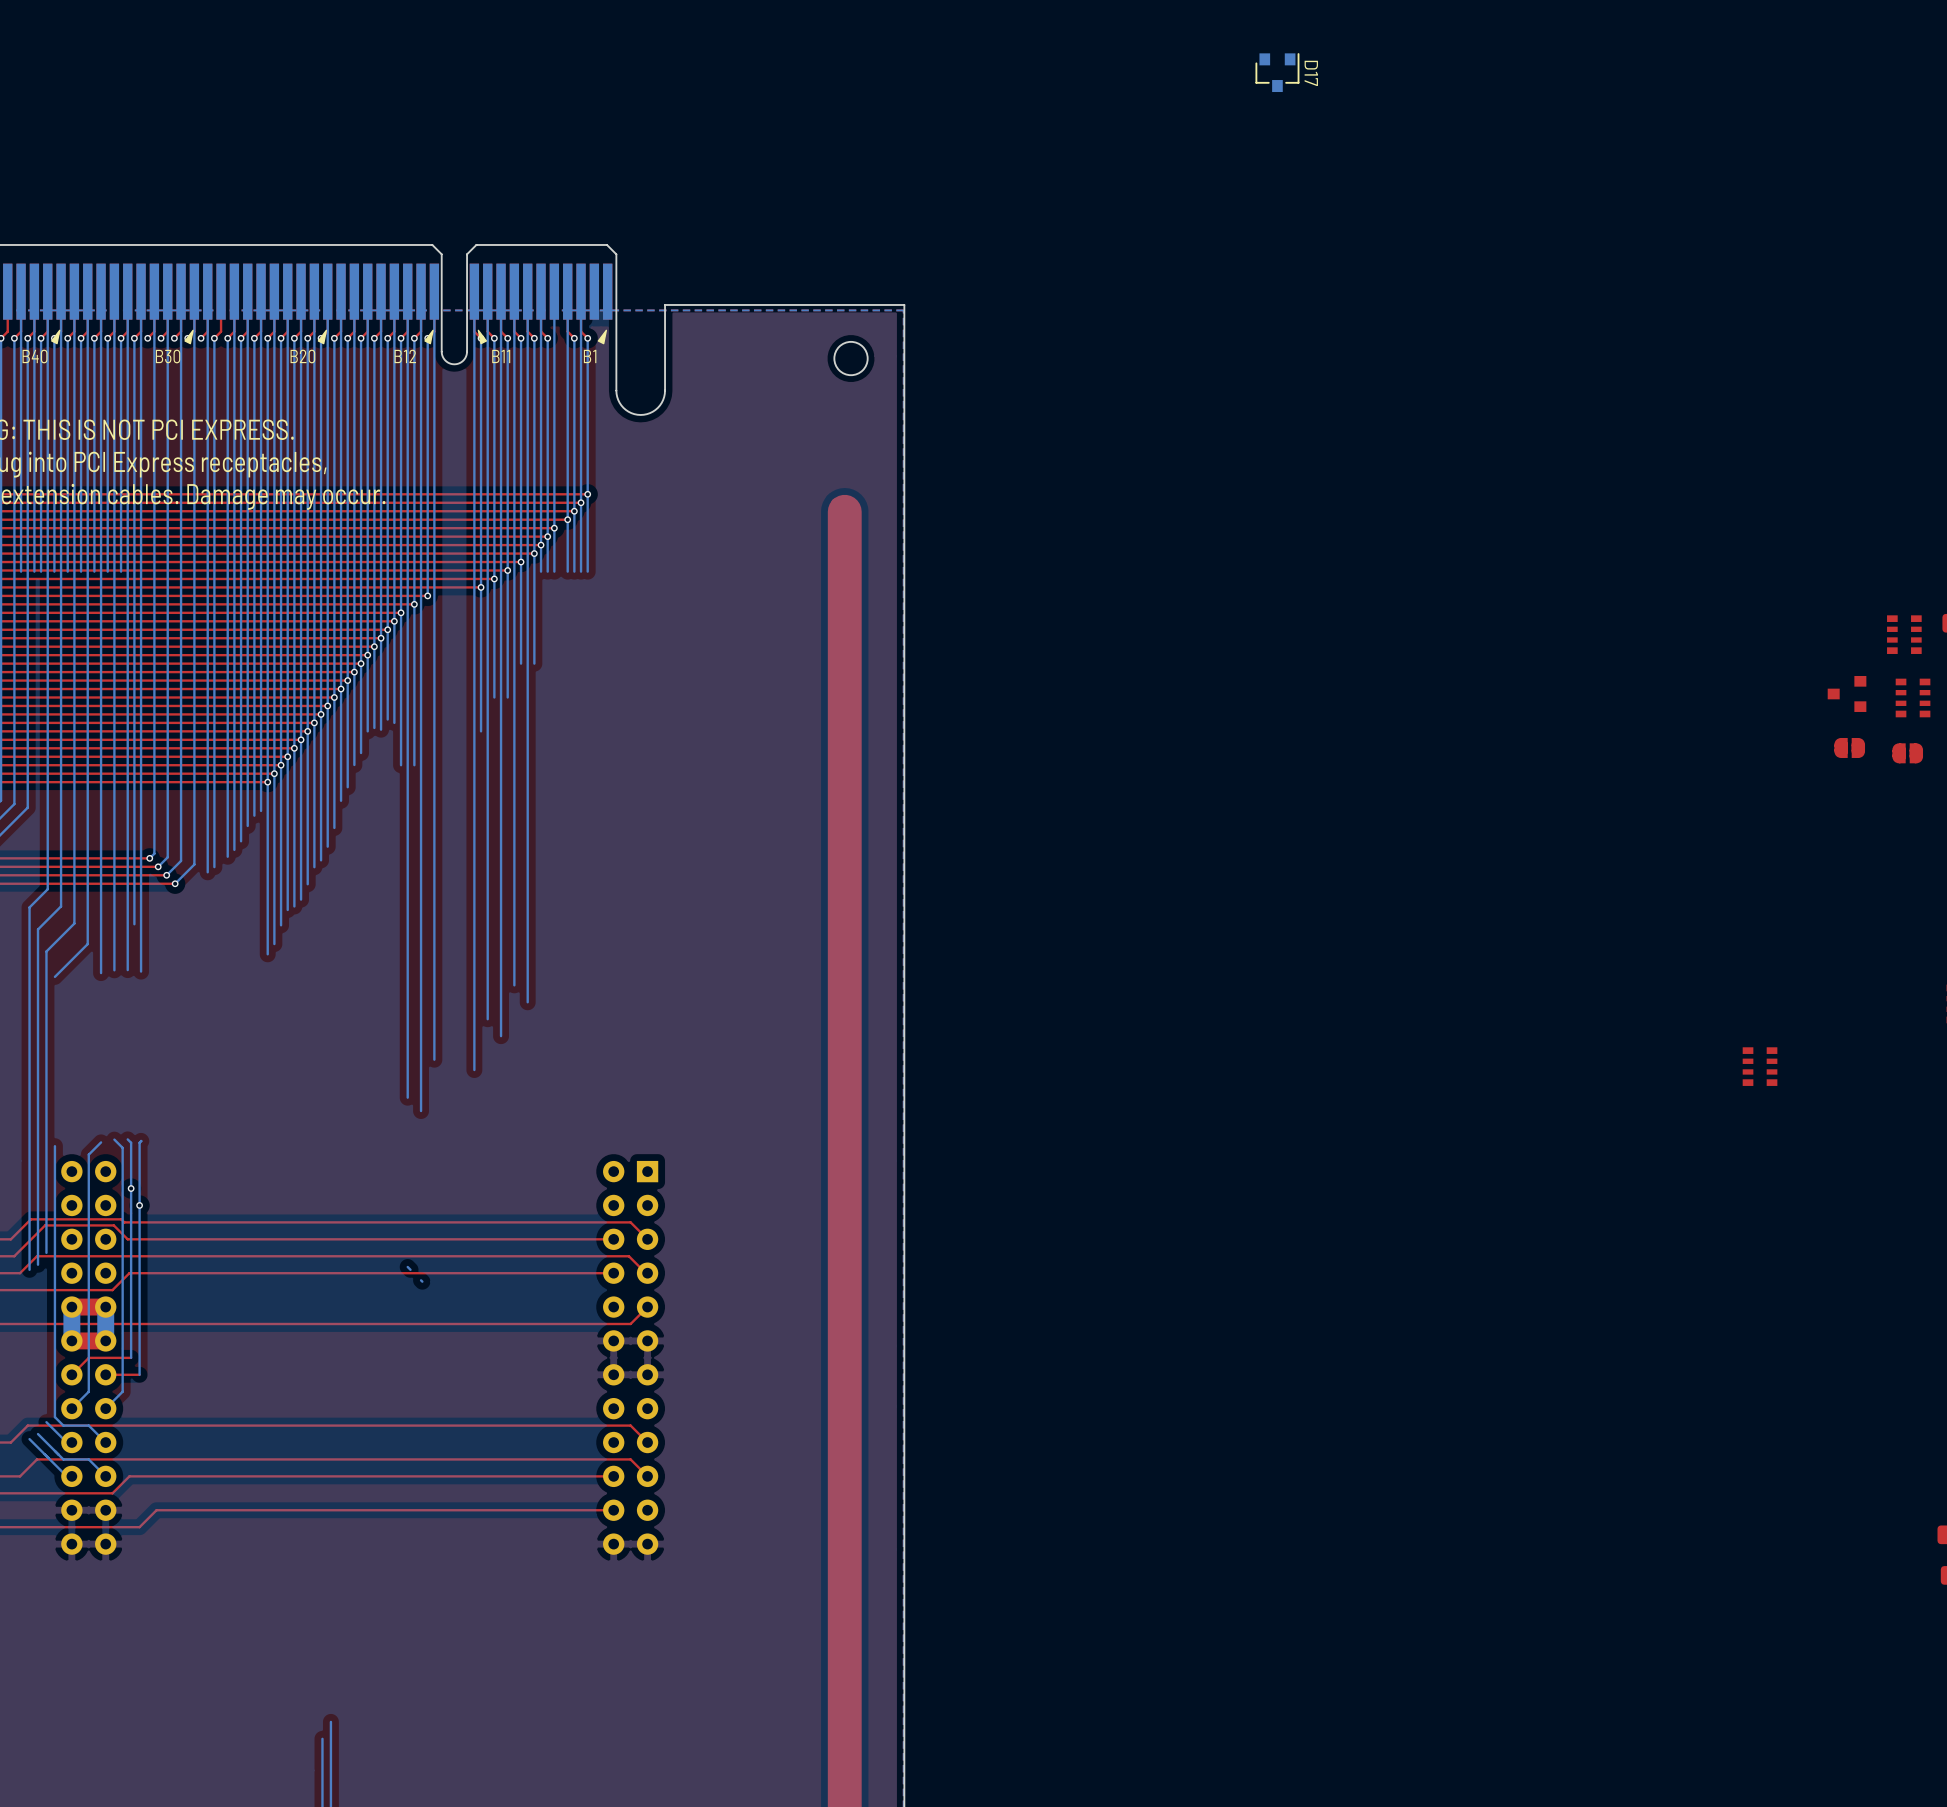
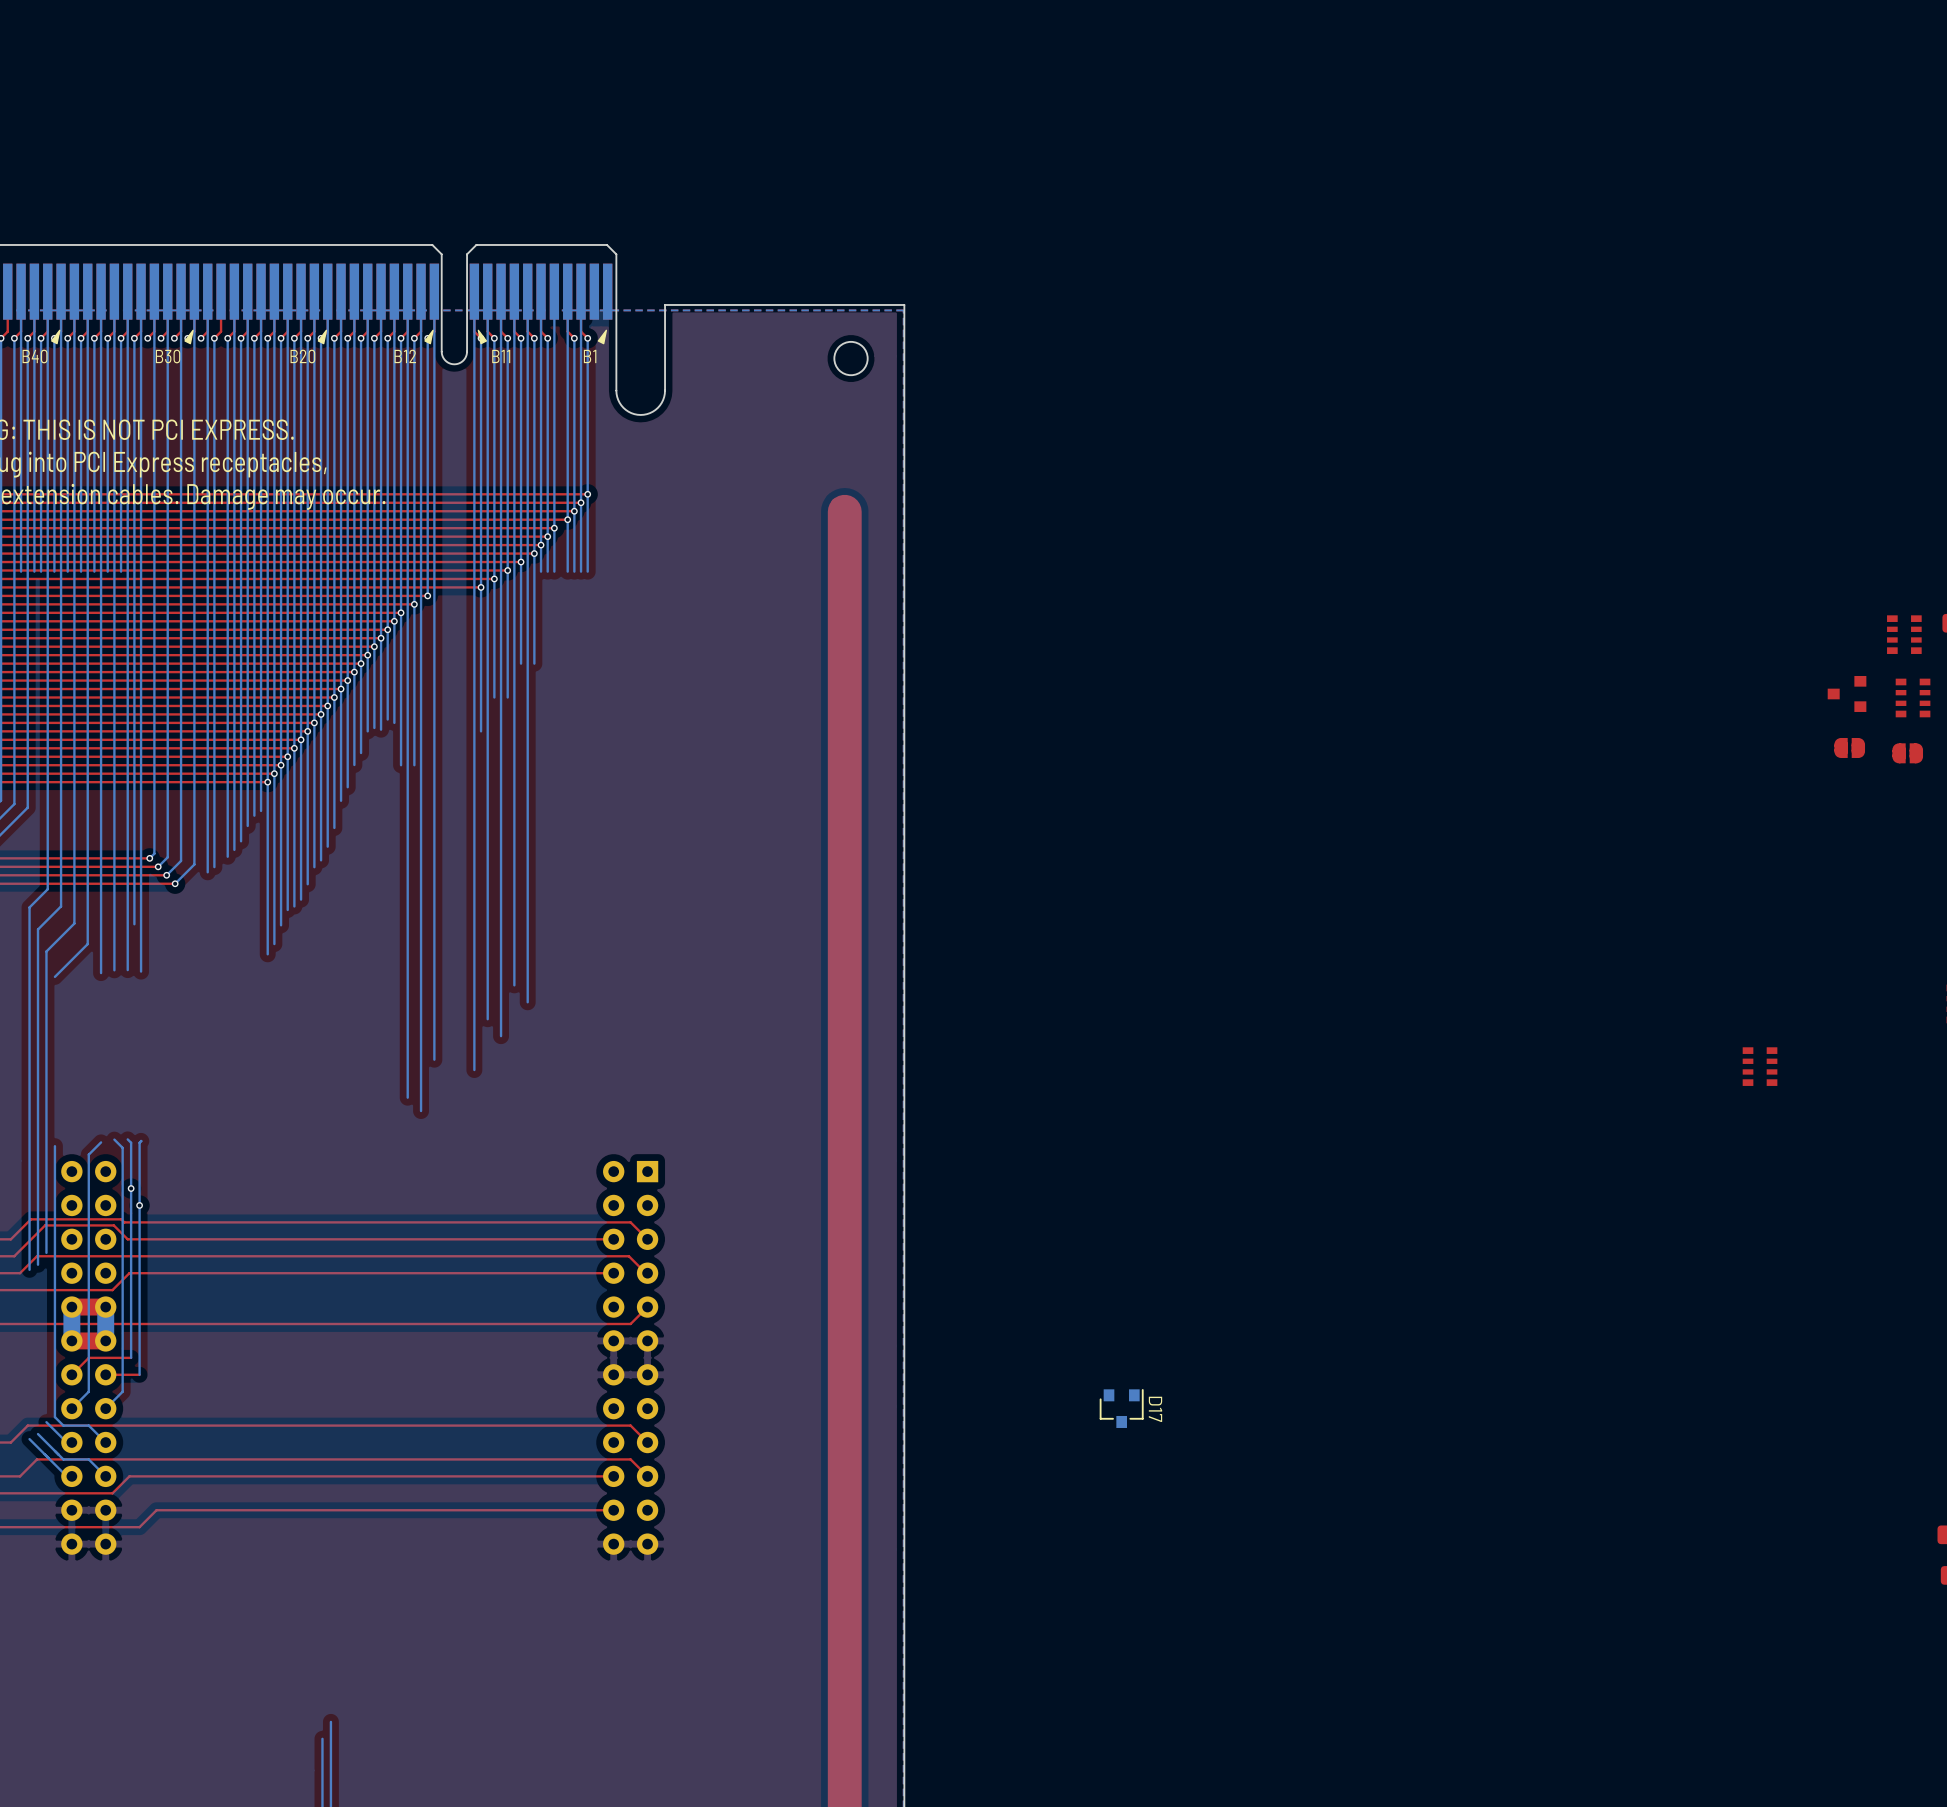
D17 position: (1277, 72) -> (1121, 1408)
bottom track: (407, 1267) (410, 1269) -> none
bottom track: (421, 1280) (422, 1281) -> none

